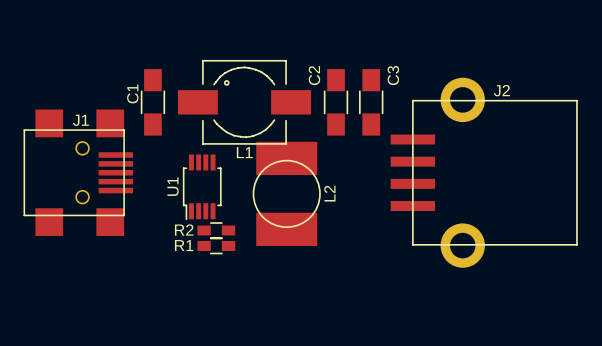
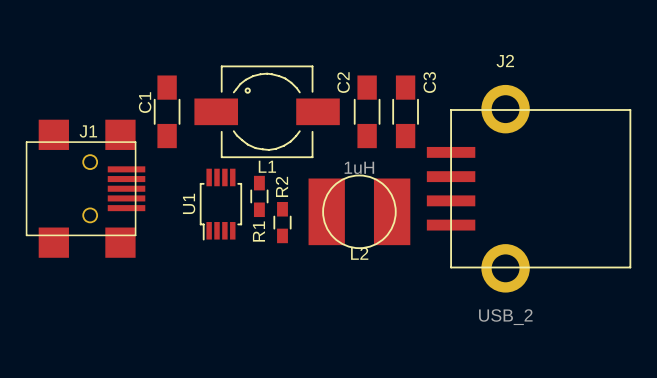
J2 name position: J2 (501, 90) -> J2 (505, 61)
L2 footprint: [252, 141, 321, 246] -> [308, 174, 411, 250]
L2 value: none -> 1uH (359, 167)
L2 name position: L2 (329, 193) -> L2 (359, 253)
R2 rotation: 0° (216, 230) -> 90° clockwise (282, 222)
R2 position: (216, 230) -> (282, 222)
R1 name position: R1 (184, 245) -> R1 (258, 231)
R1 rotation: 0° (216, 245) -> 90° clockwise (259, 196)
R1 position: (216, 245) -> (259, 196)
J2 value: none -> USB_2 (505, 317)

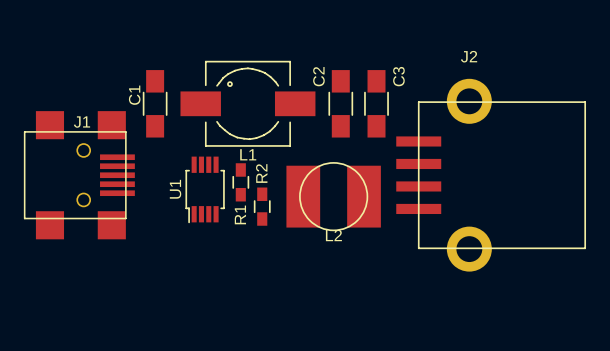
L2 value: 1uH (359, 167) -> none
J2 value: USB_2 (505, 317) -> none

